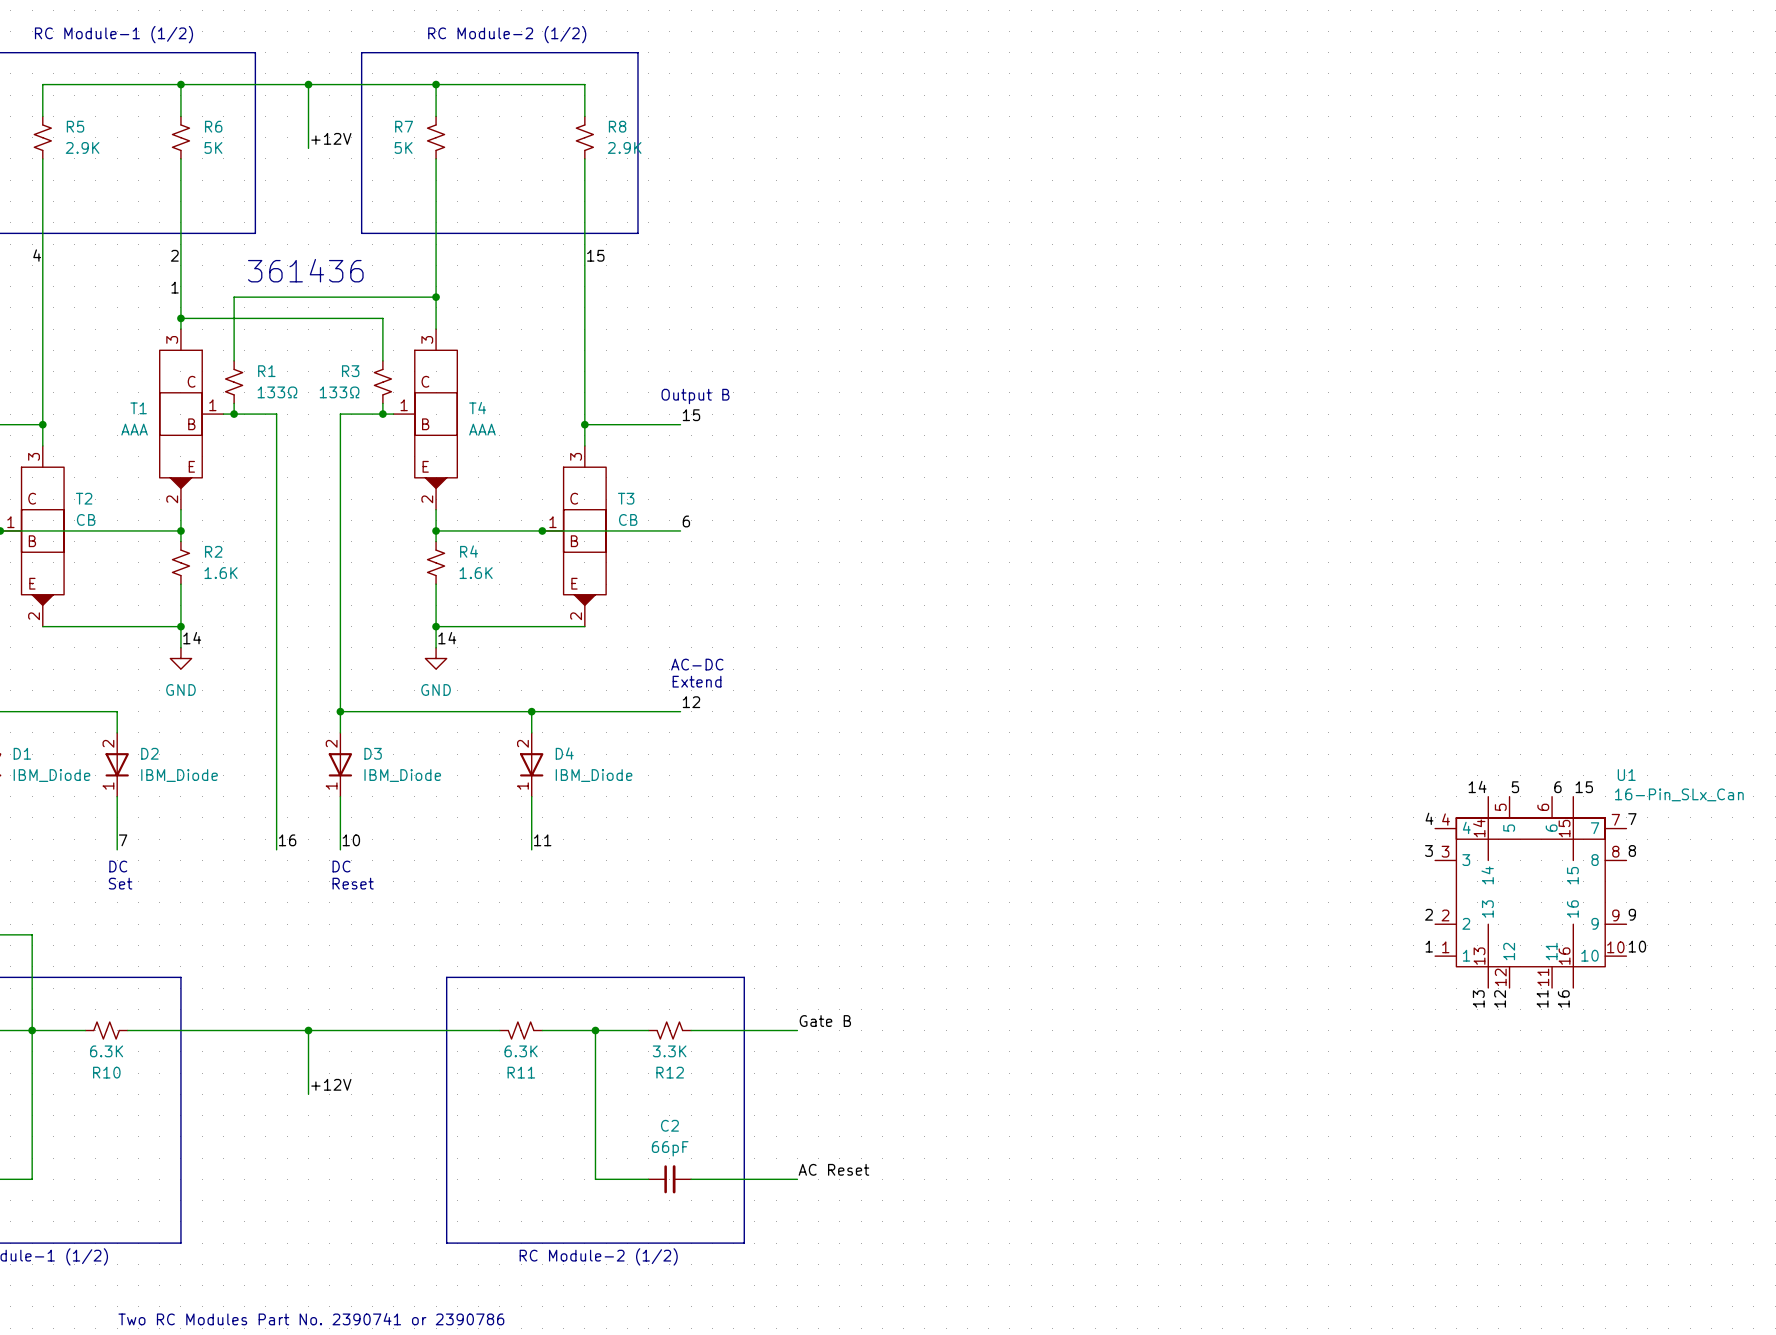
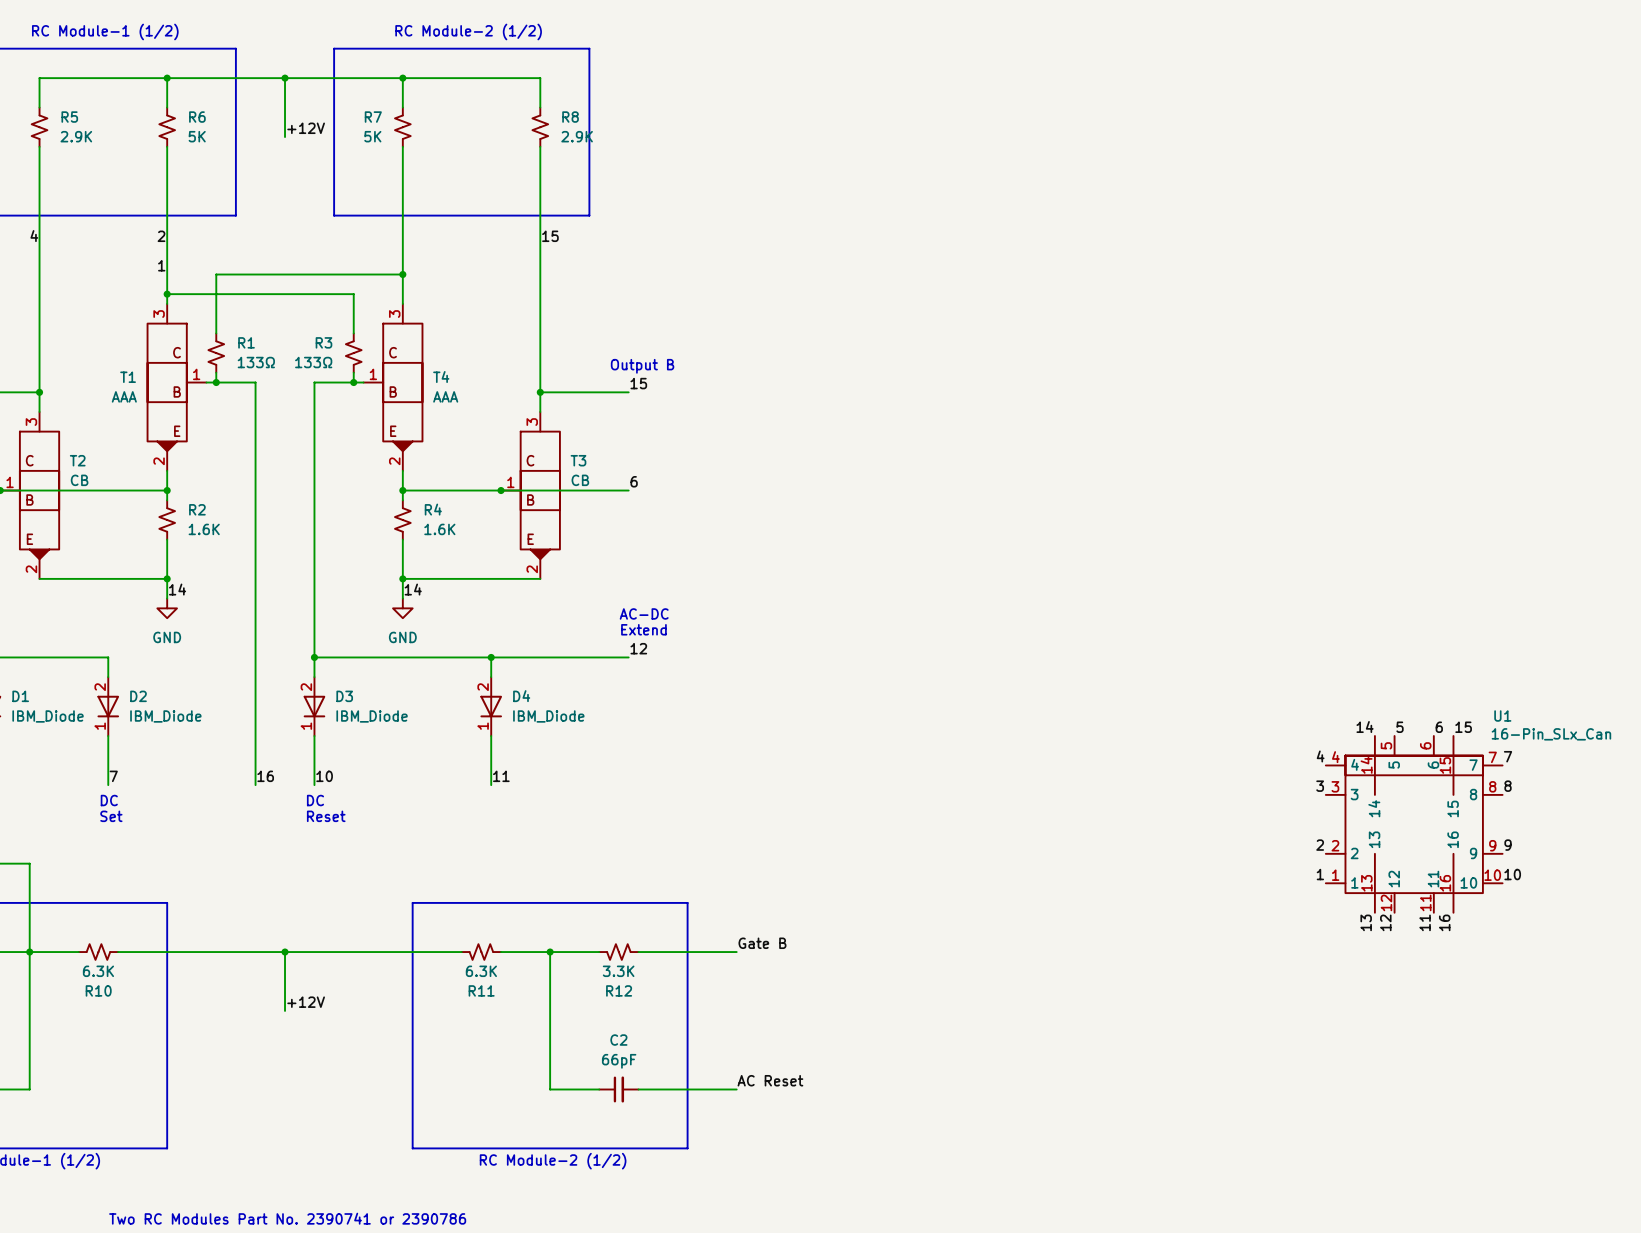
text: 361436 (305, 270) -> none

